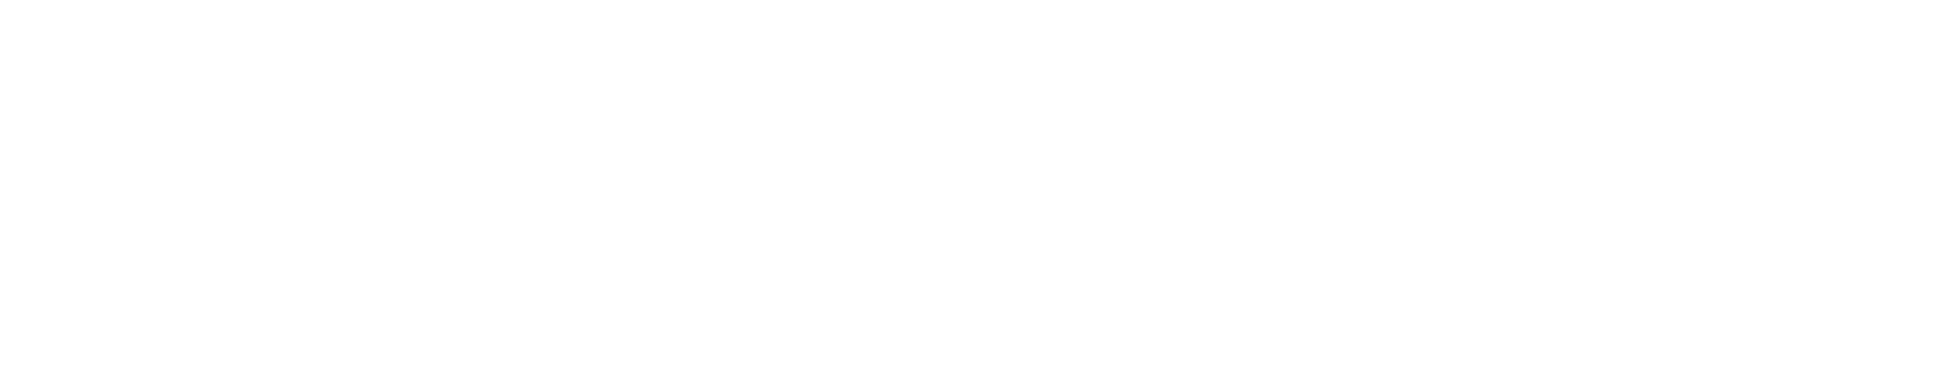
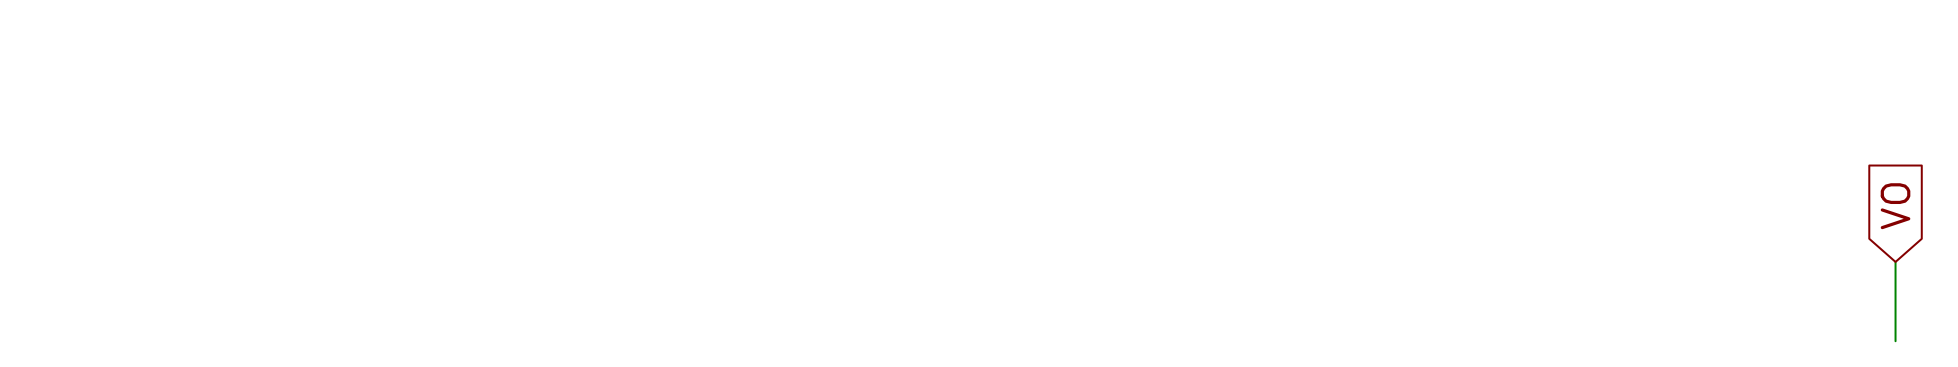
global label: none -> VO (1895, 206)
wire: none -> (1895, 261) (1895, 341)

